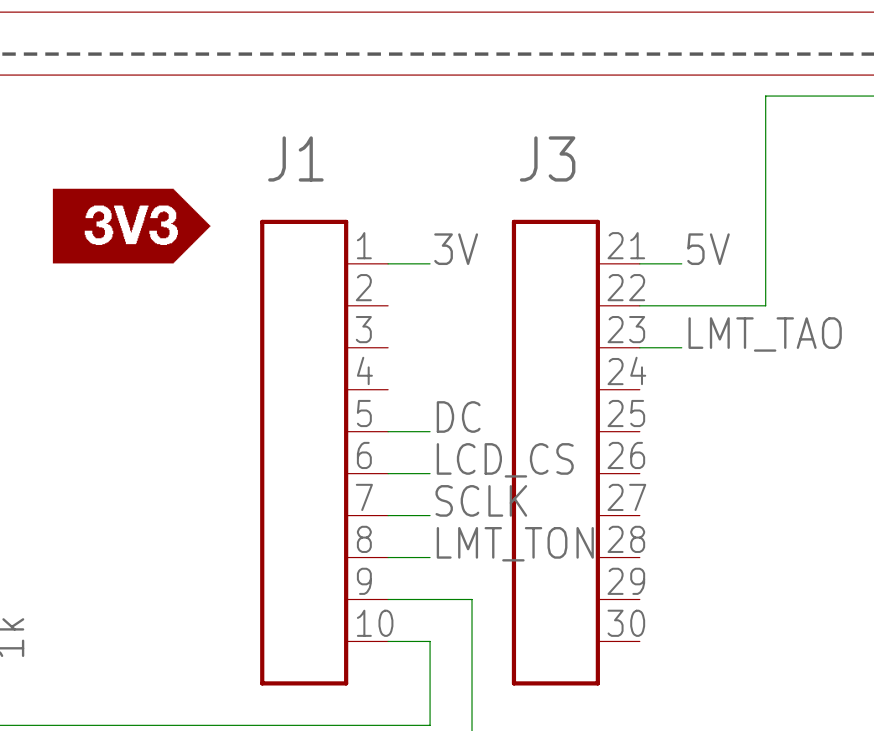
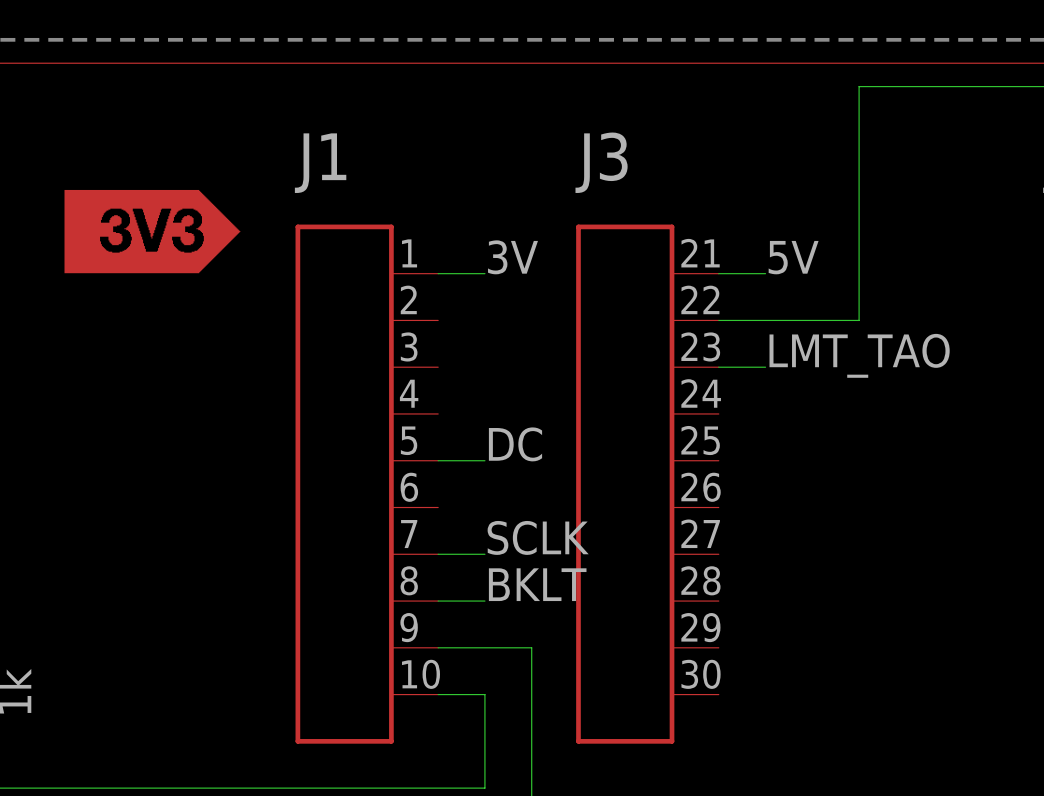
label: LCD_CS (505, 460) -> none
wire: (388, 473) (430, 473) -> none
label: LMT_TON (515, 544) -> BKLT (537, 584)

